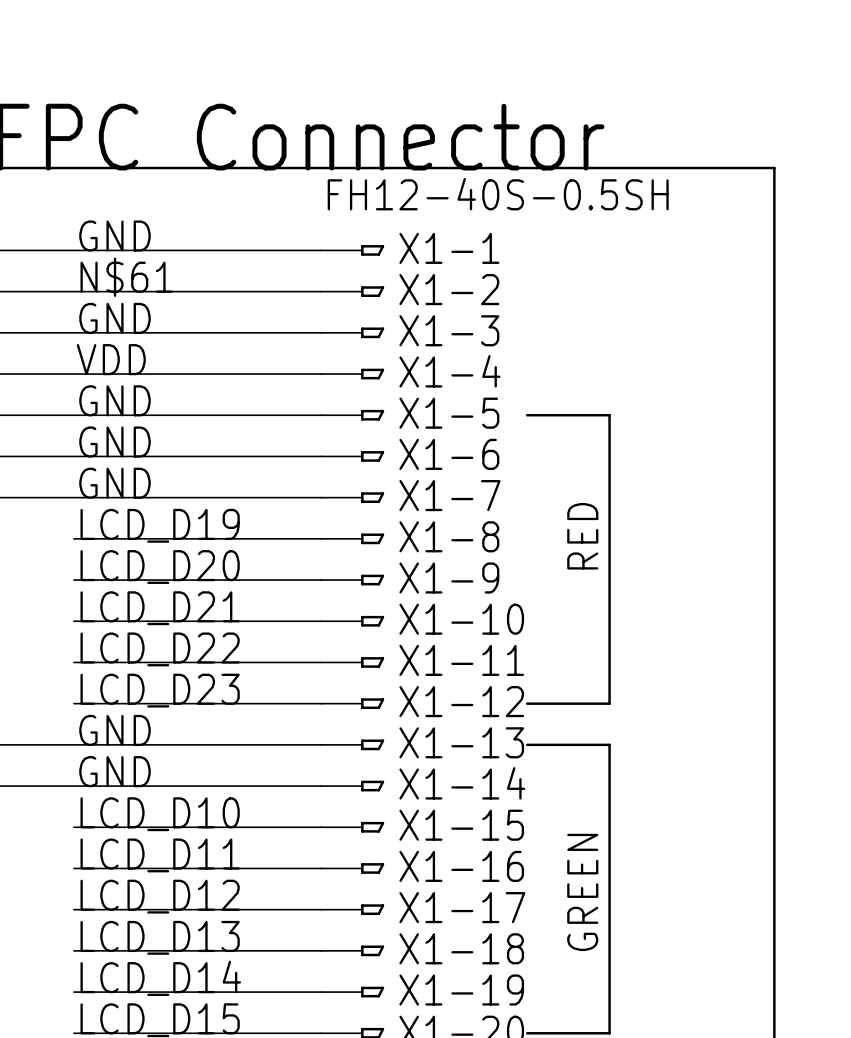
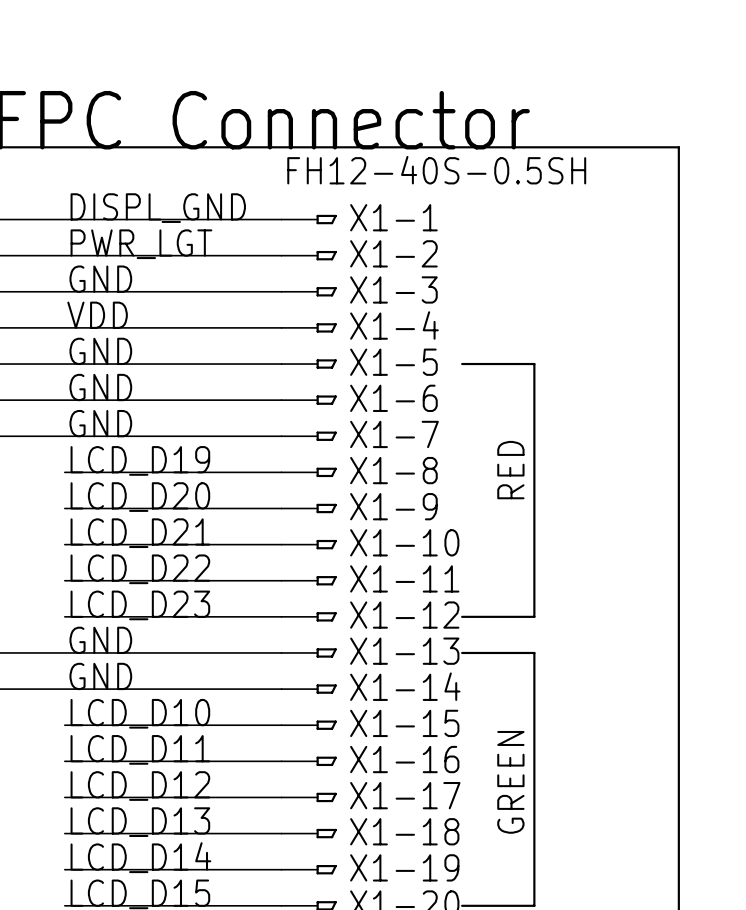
label: GND (115, 236) -> DISPL_GND (158, 208)
label: N$61 (126, 277) -> PWR_LGT (141, 244)

